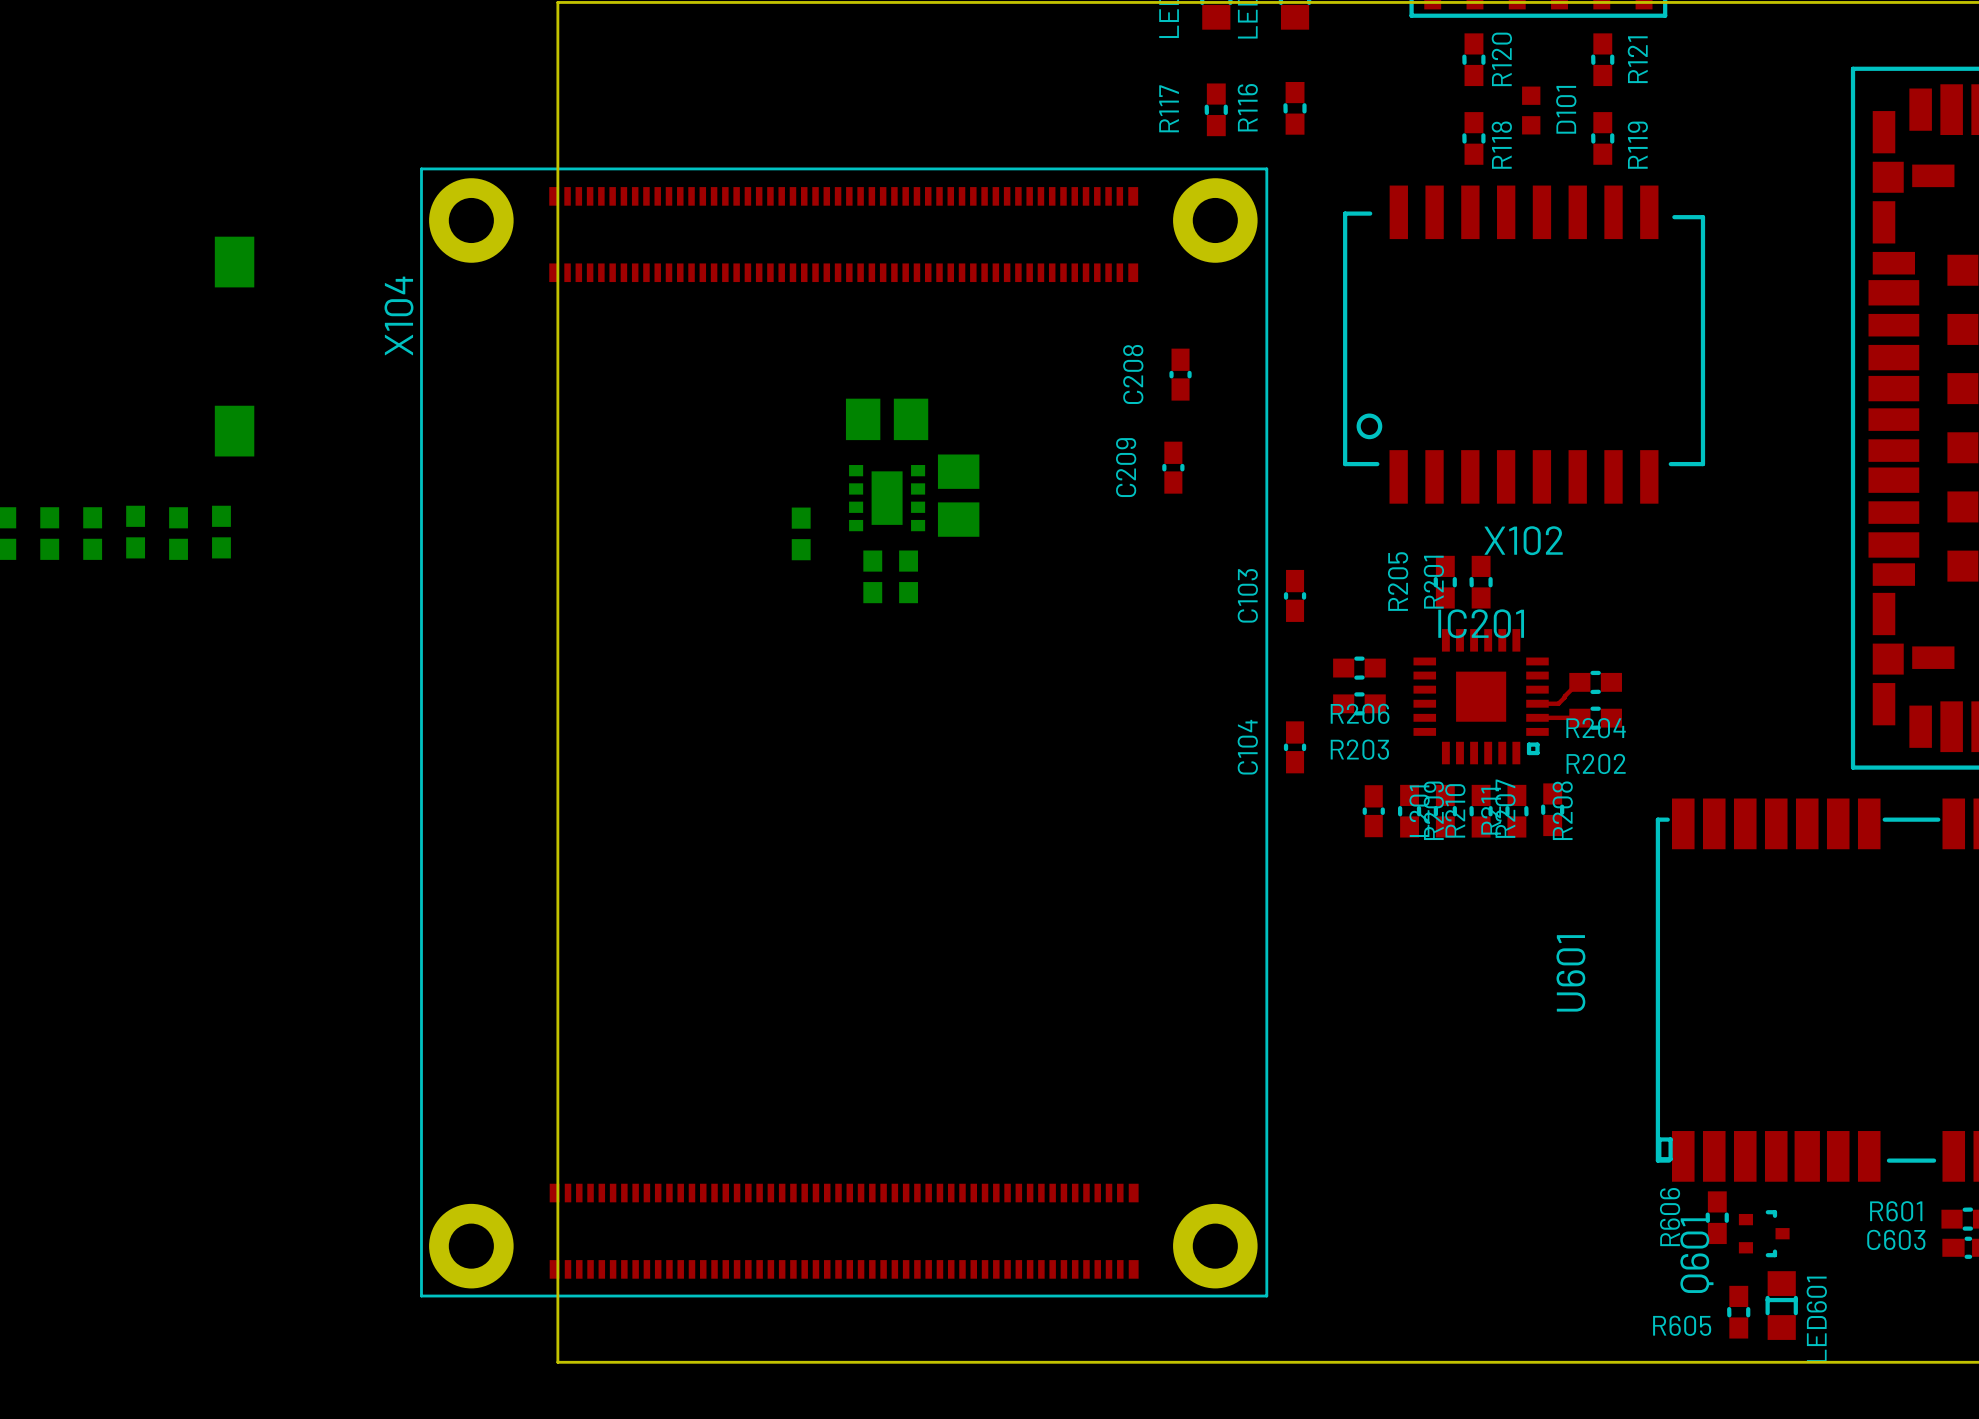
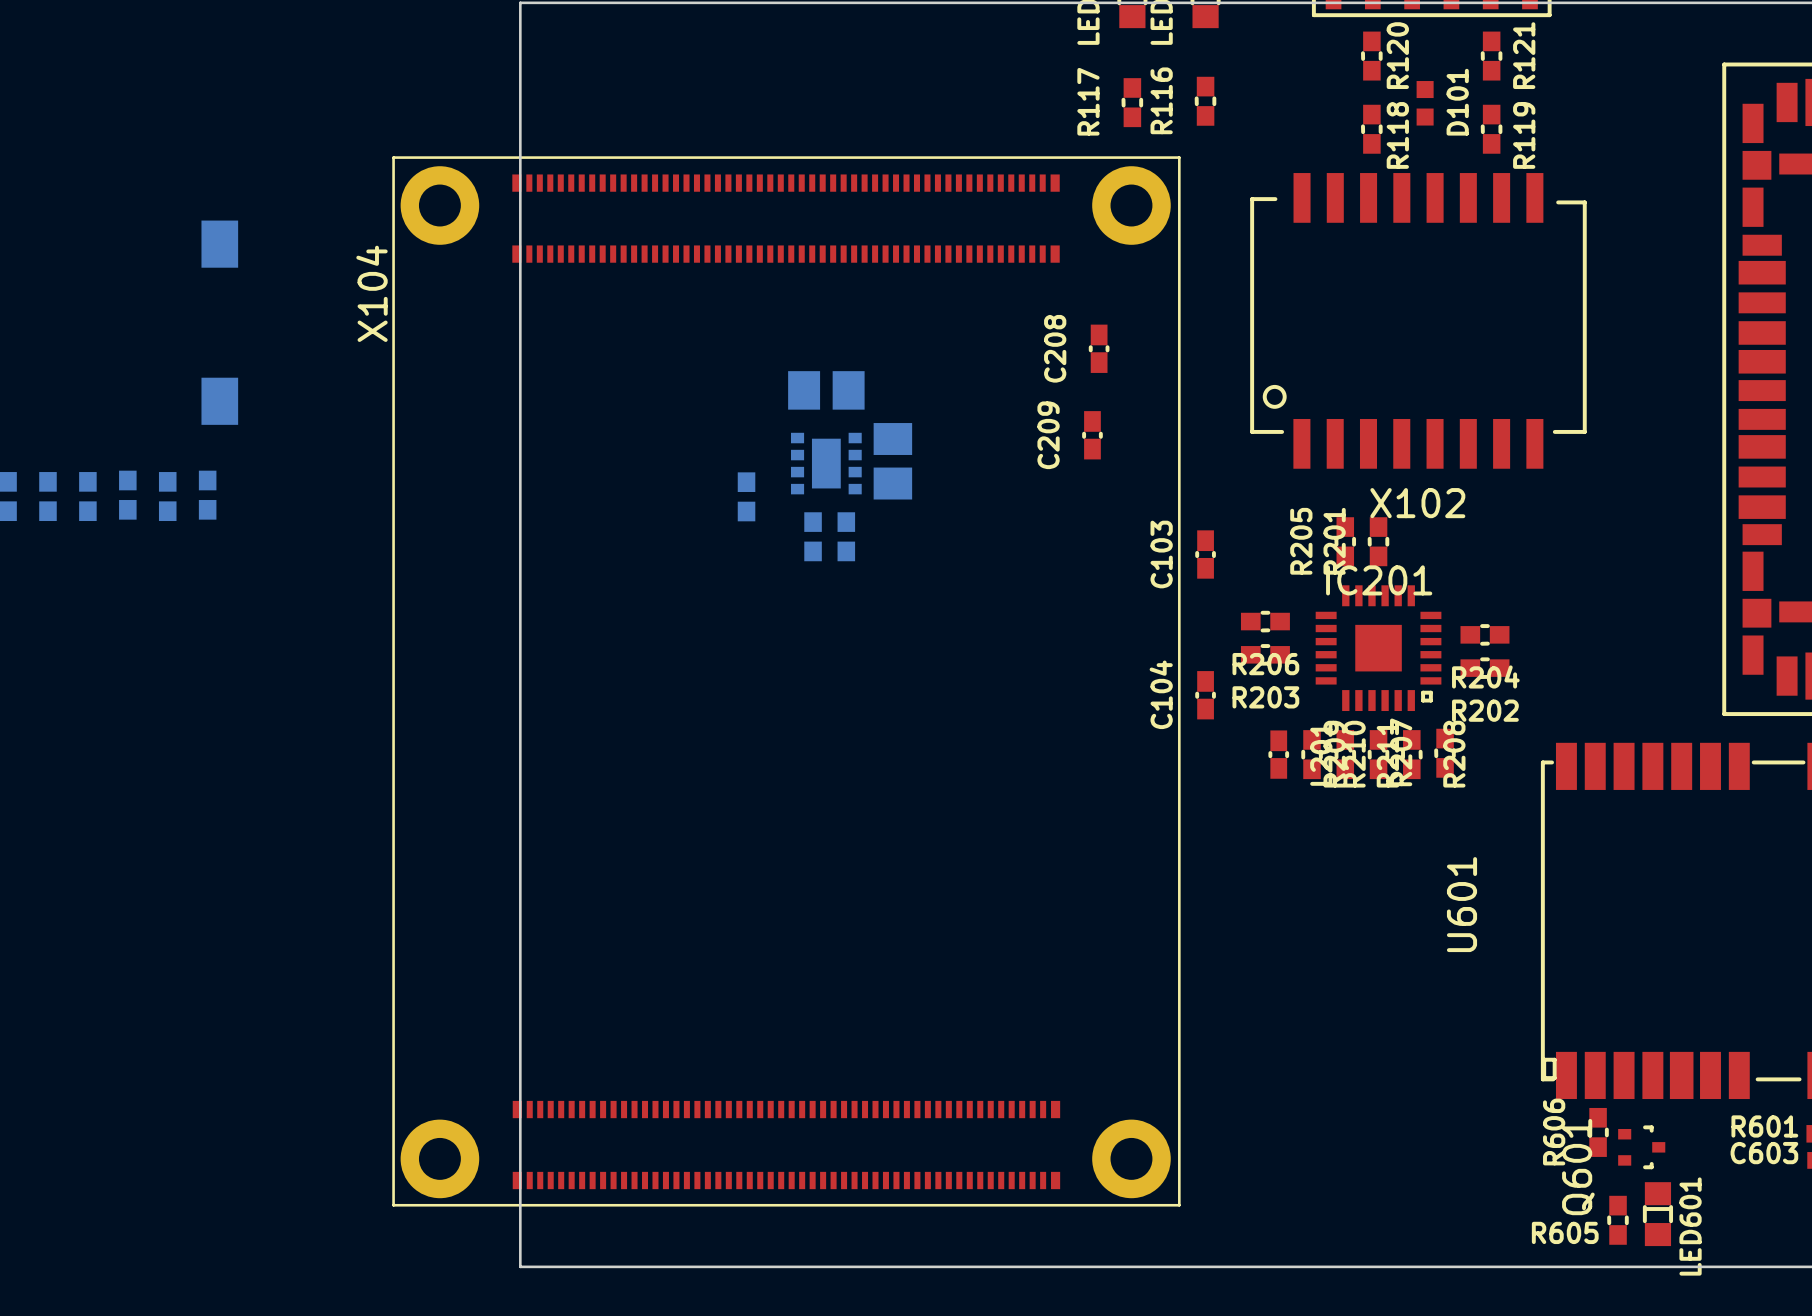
top track: (1579, 682) (1558, 703) (1537, 703) -> none
top track: (1537, 717) (1579, 717) -> none

